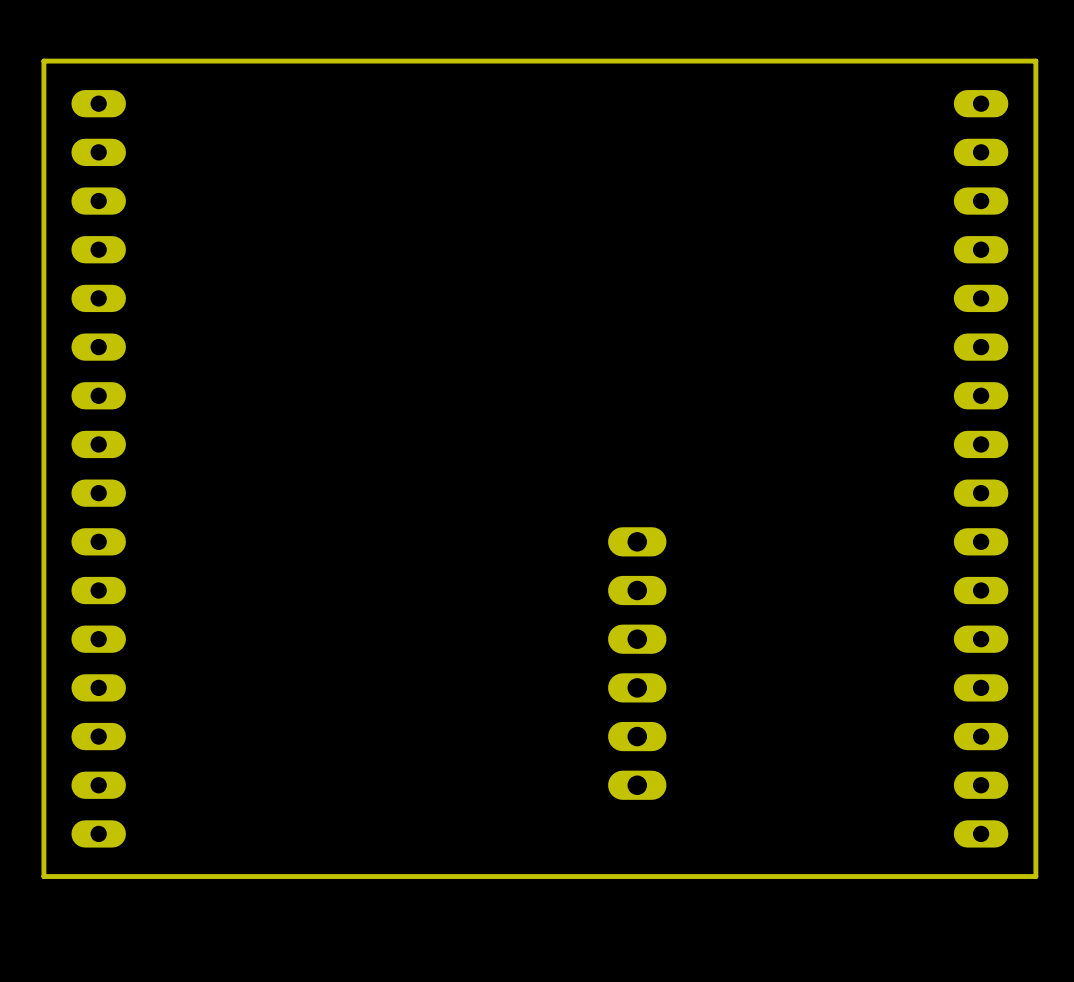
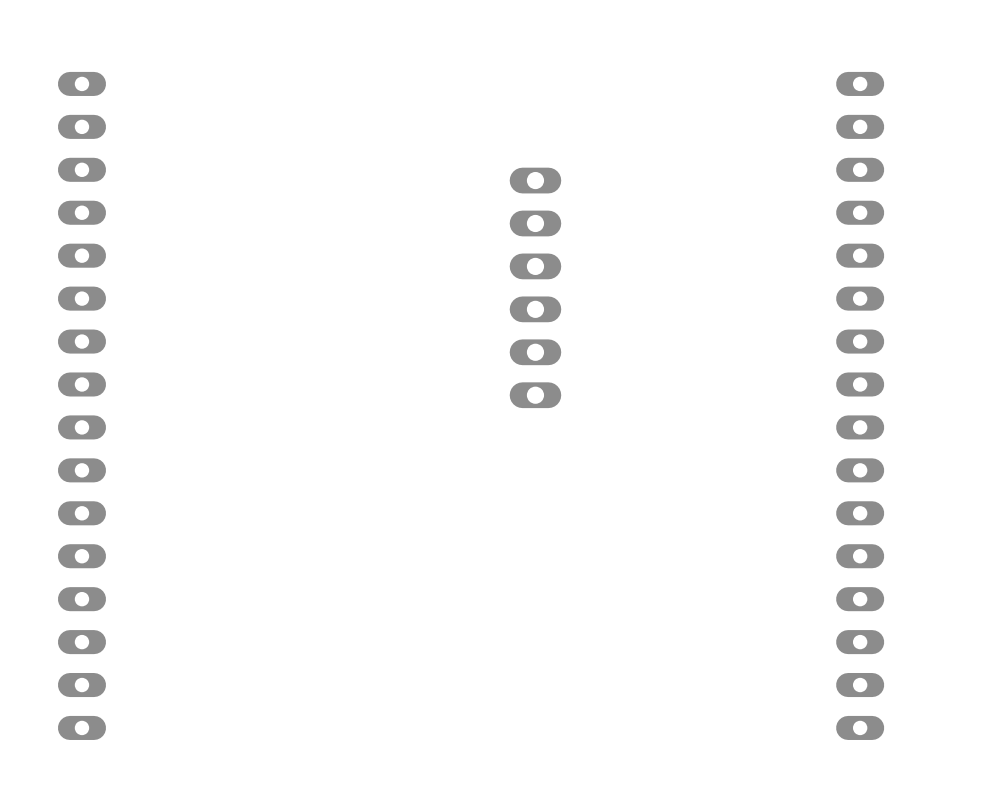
board edge: (1035, 61) (1035, 876) (43, 876) (43, 61) (1035, 61) -> none
part position: (637, 663) -> (535, 287)

